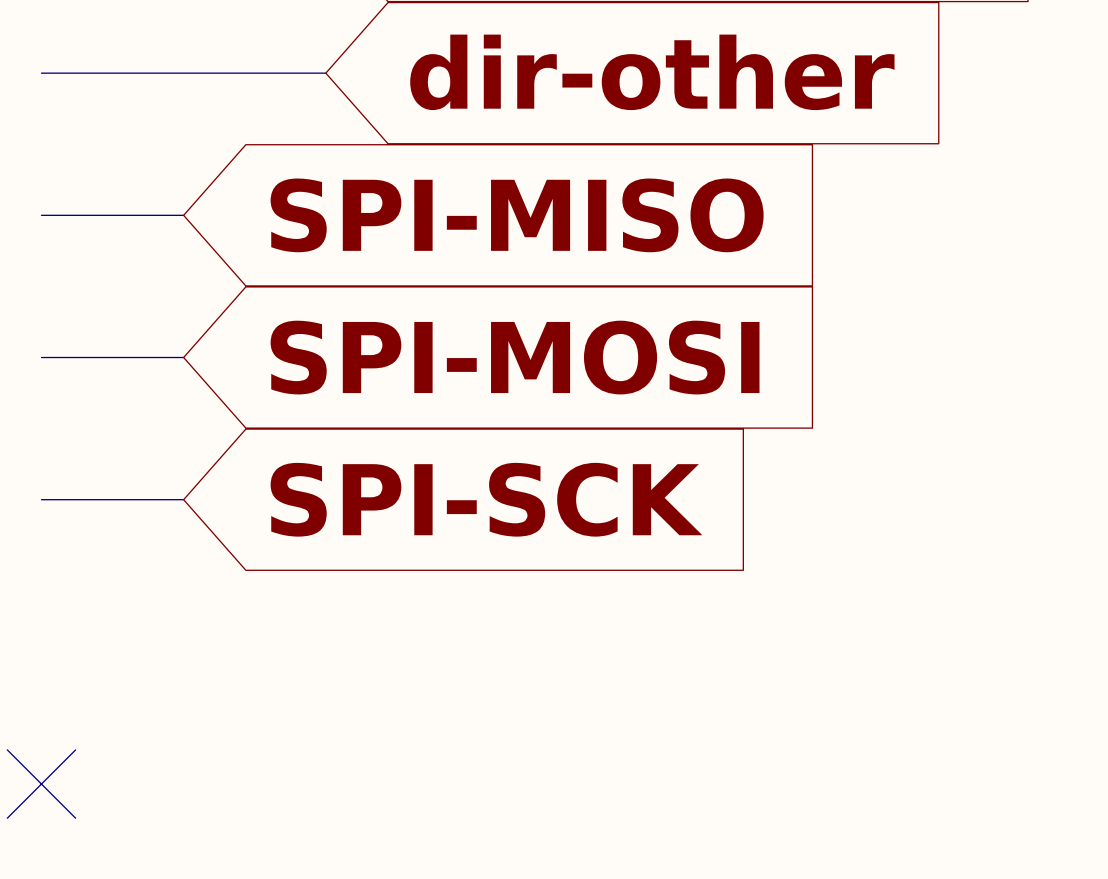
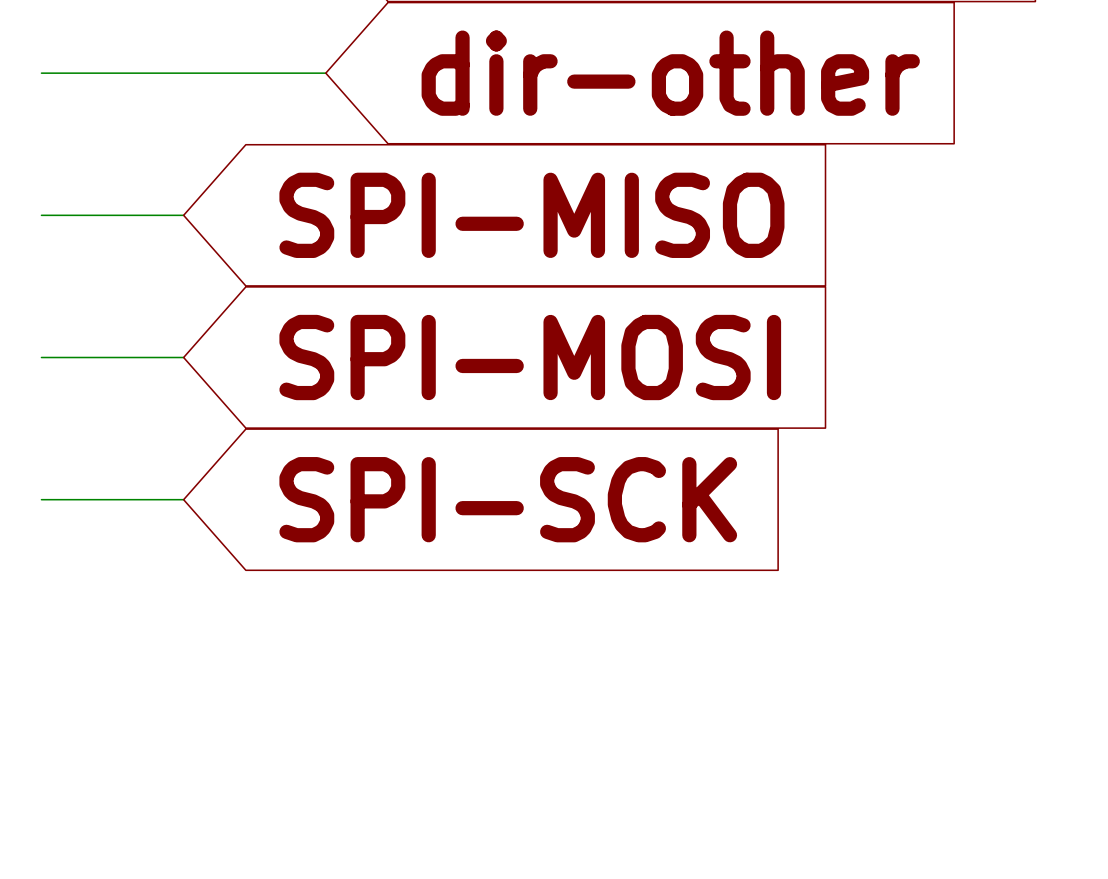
no-connect mark: (41, 784) -> none

